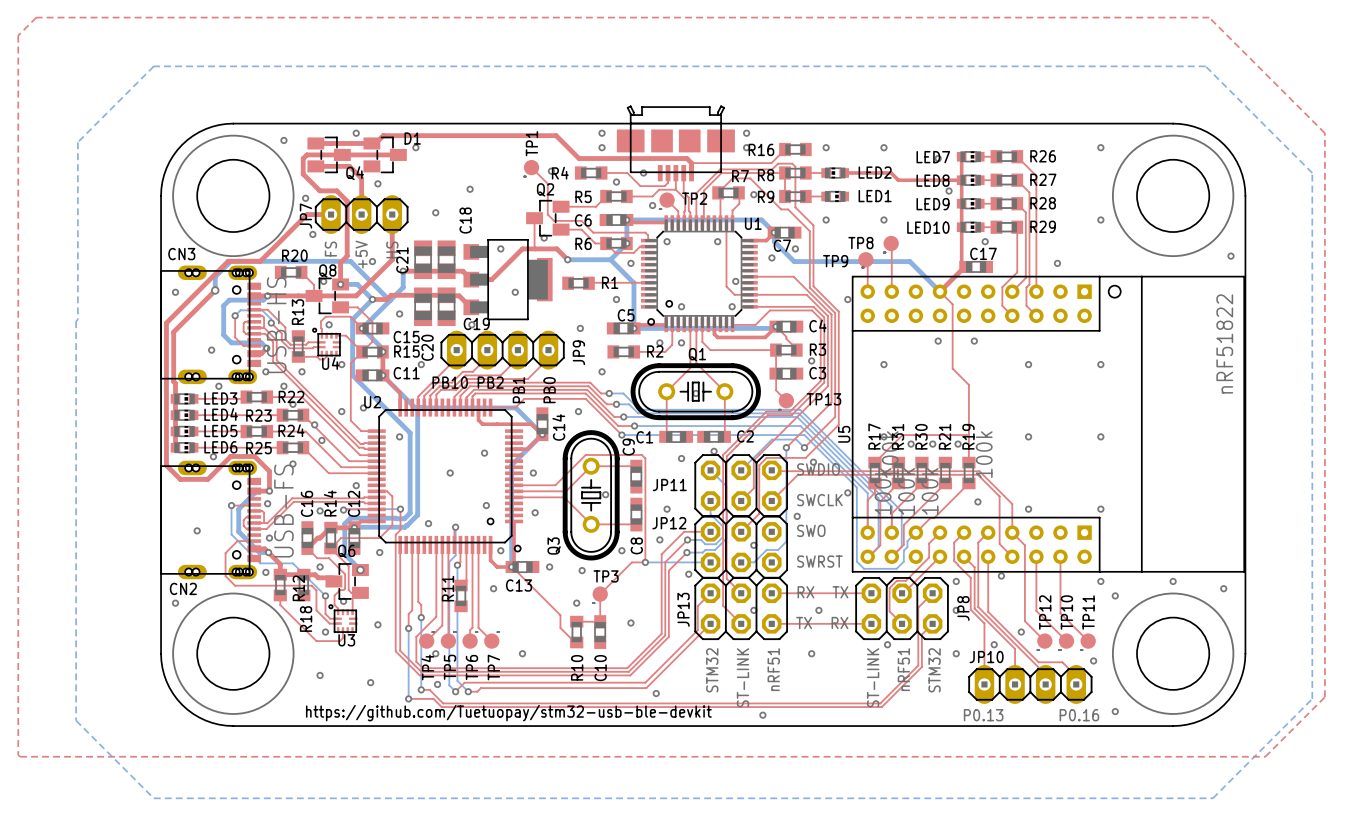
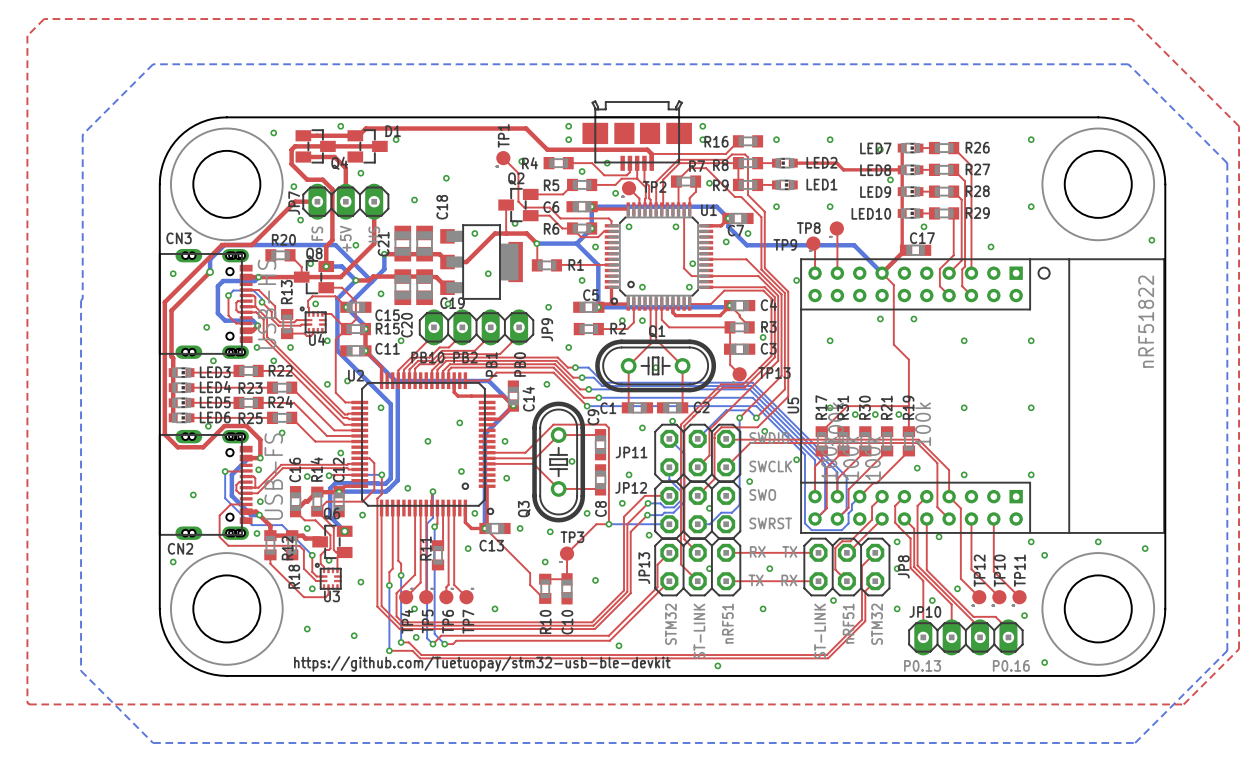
top track: none -> (537, 244) (537, 265)
top track: none -> (611, 287) (611, 303)
via: (292, 404) -> none
via: (314, 424) -> none
via: (321, 440) -> none

